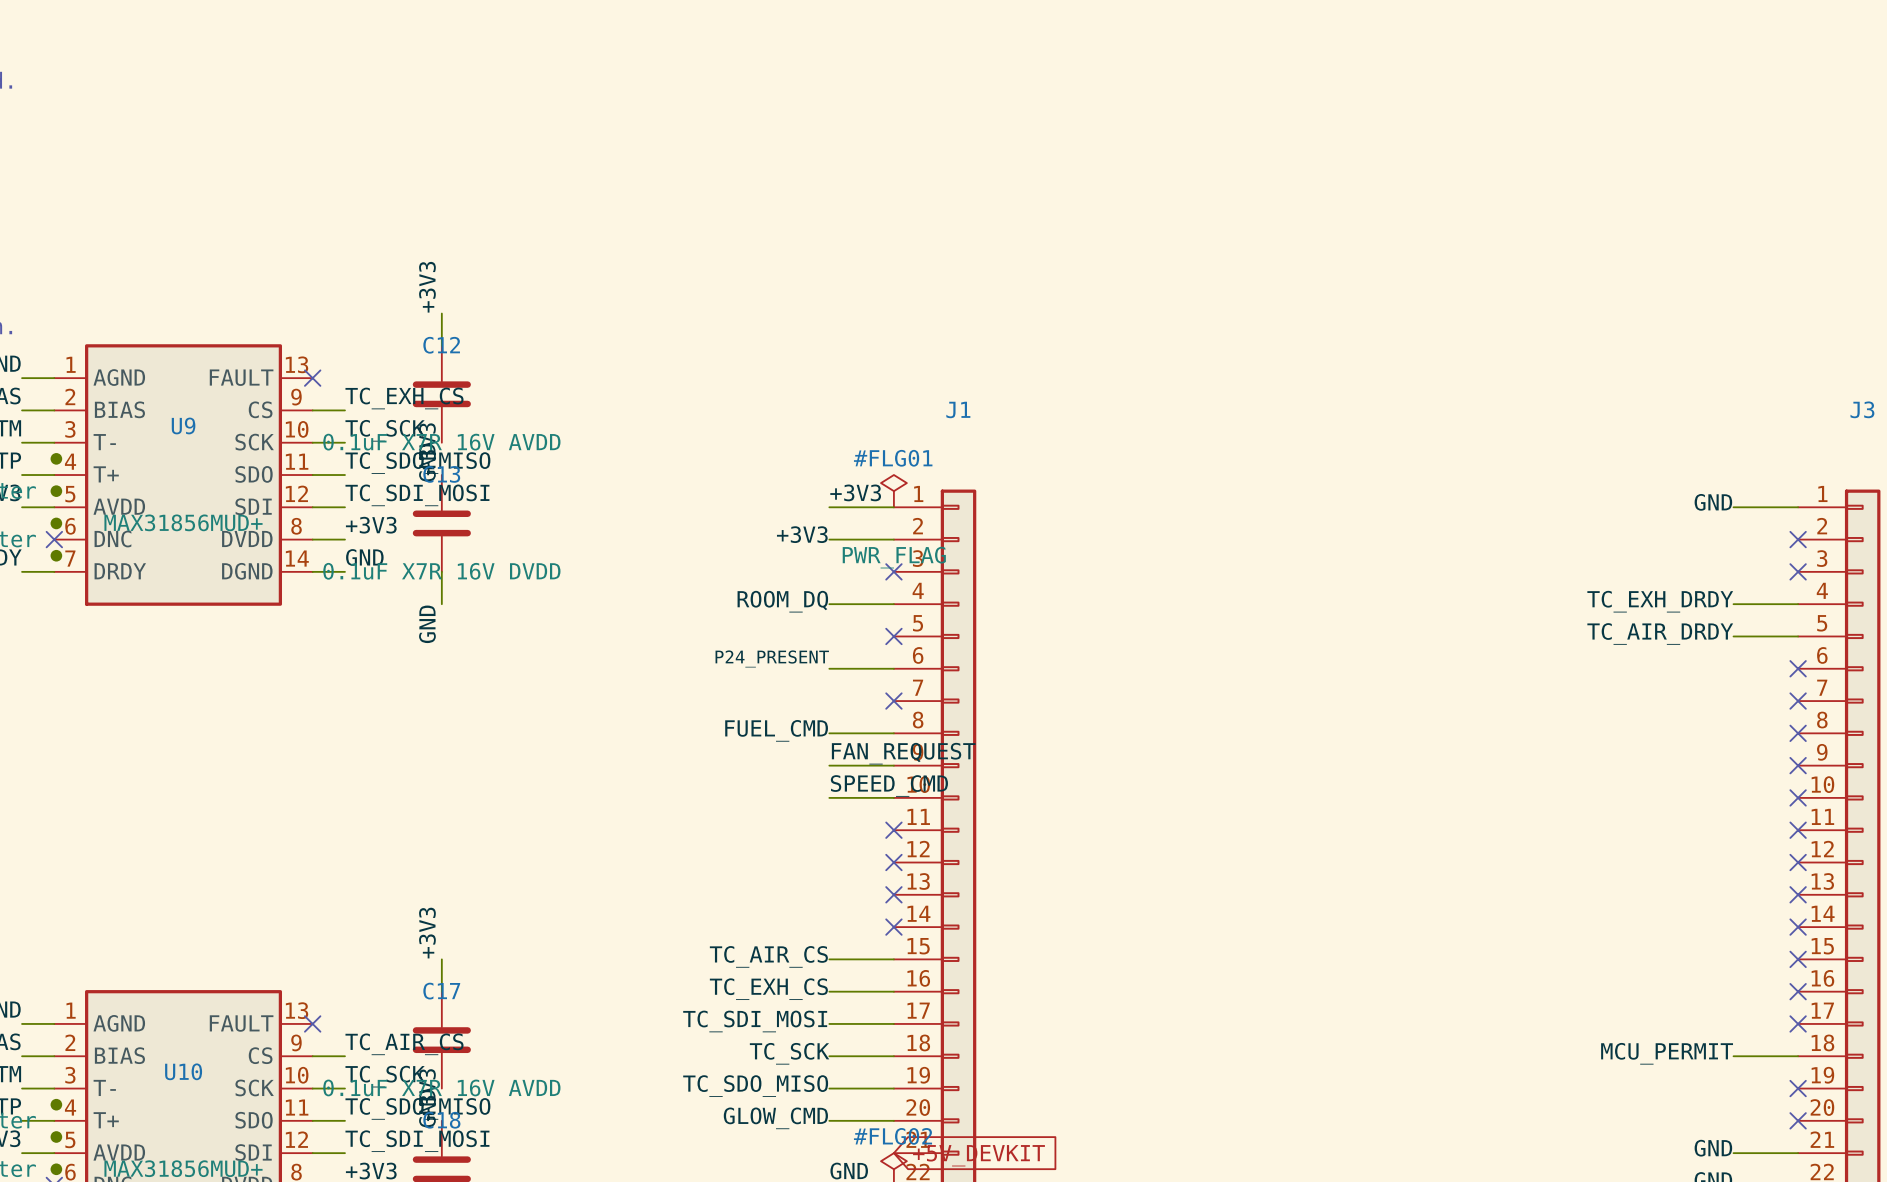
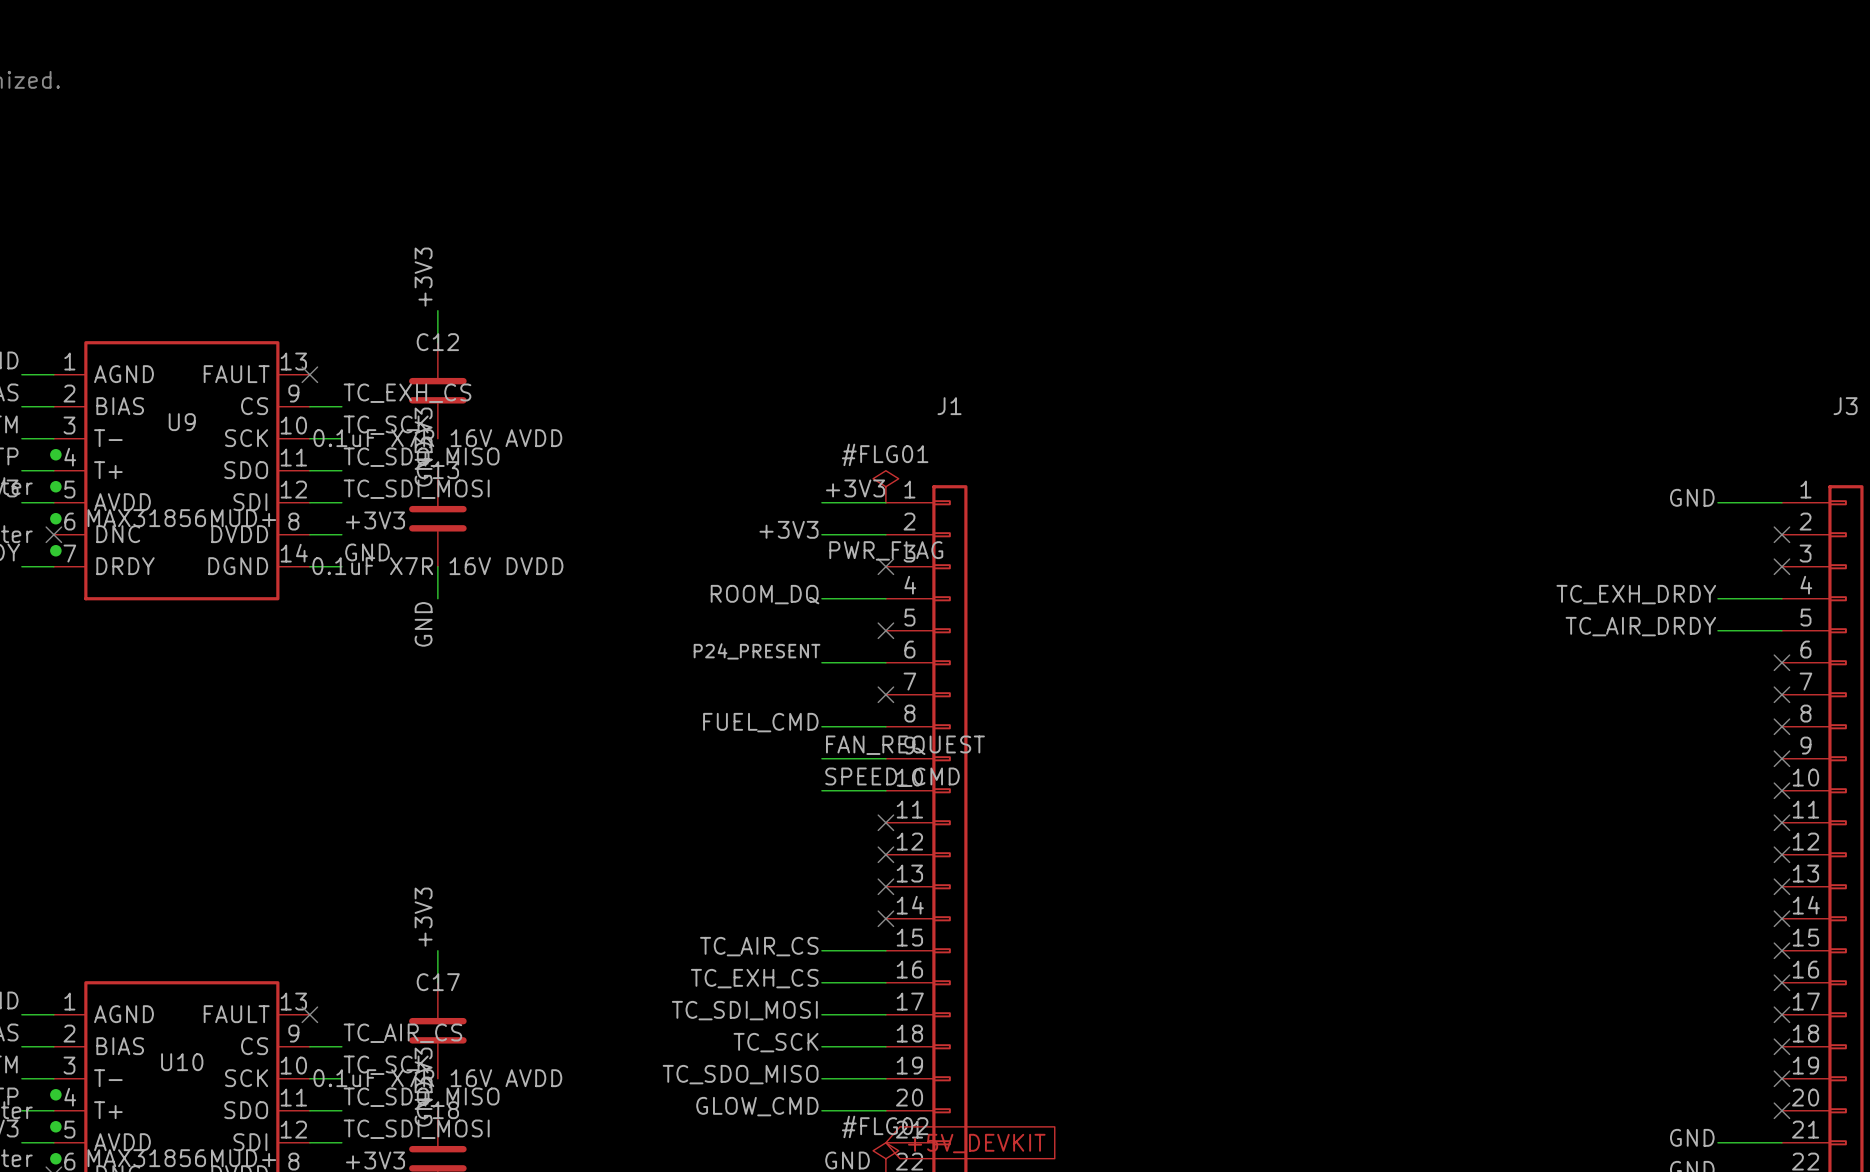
label: MCU_PERMIT (1667, 1053) -> none
wire: (1733, 1056) (1798, 1056) -> none
no-connect mark: none -> (1781, 1046)

